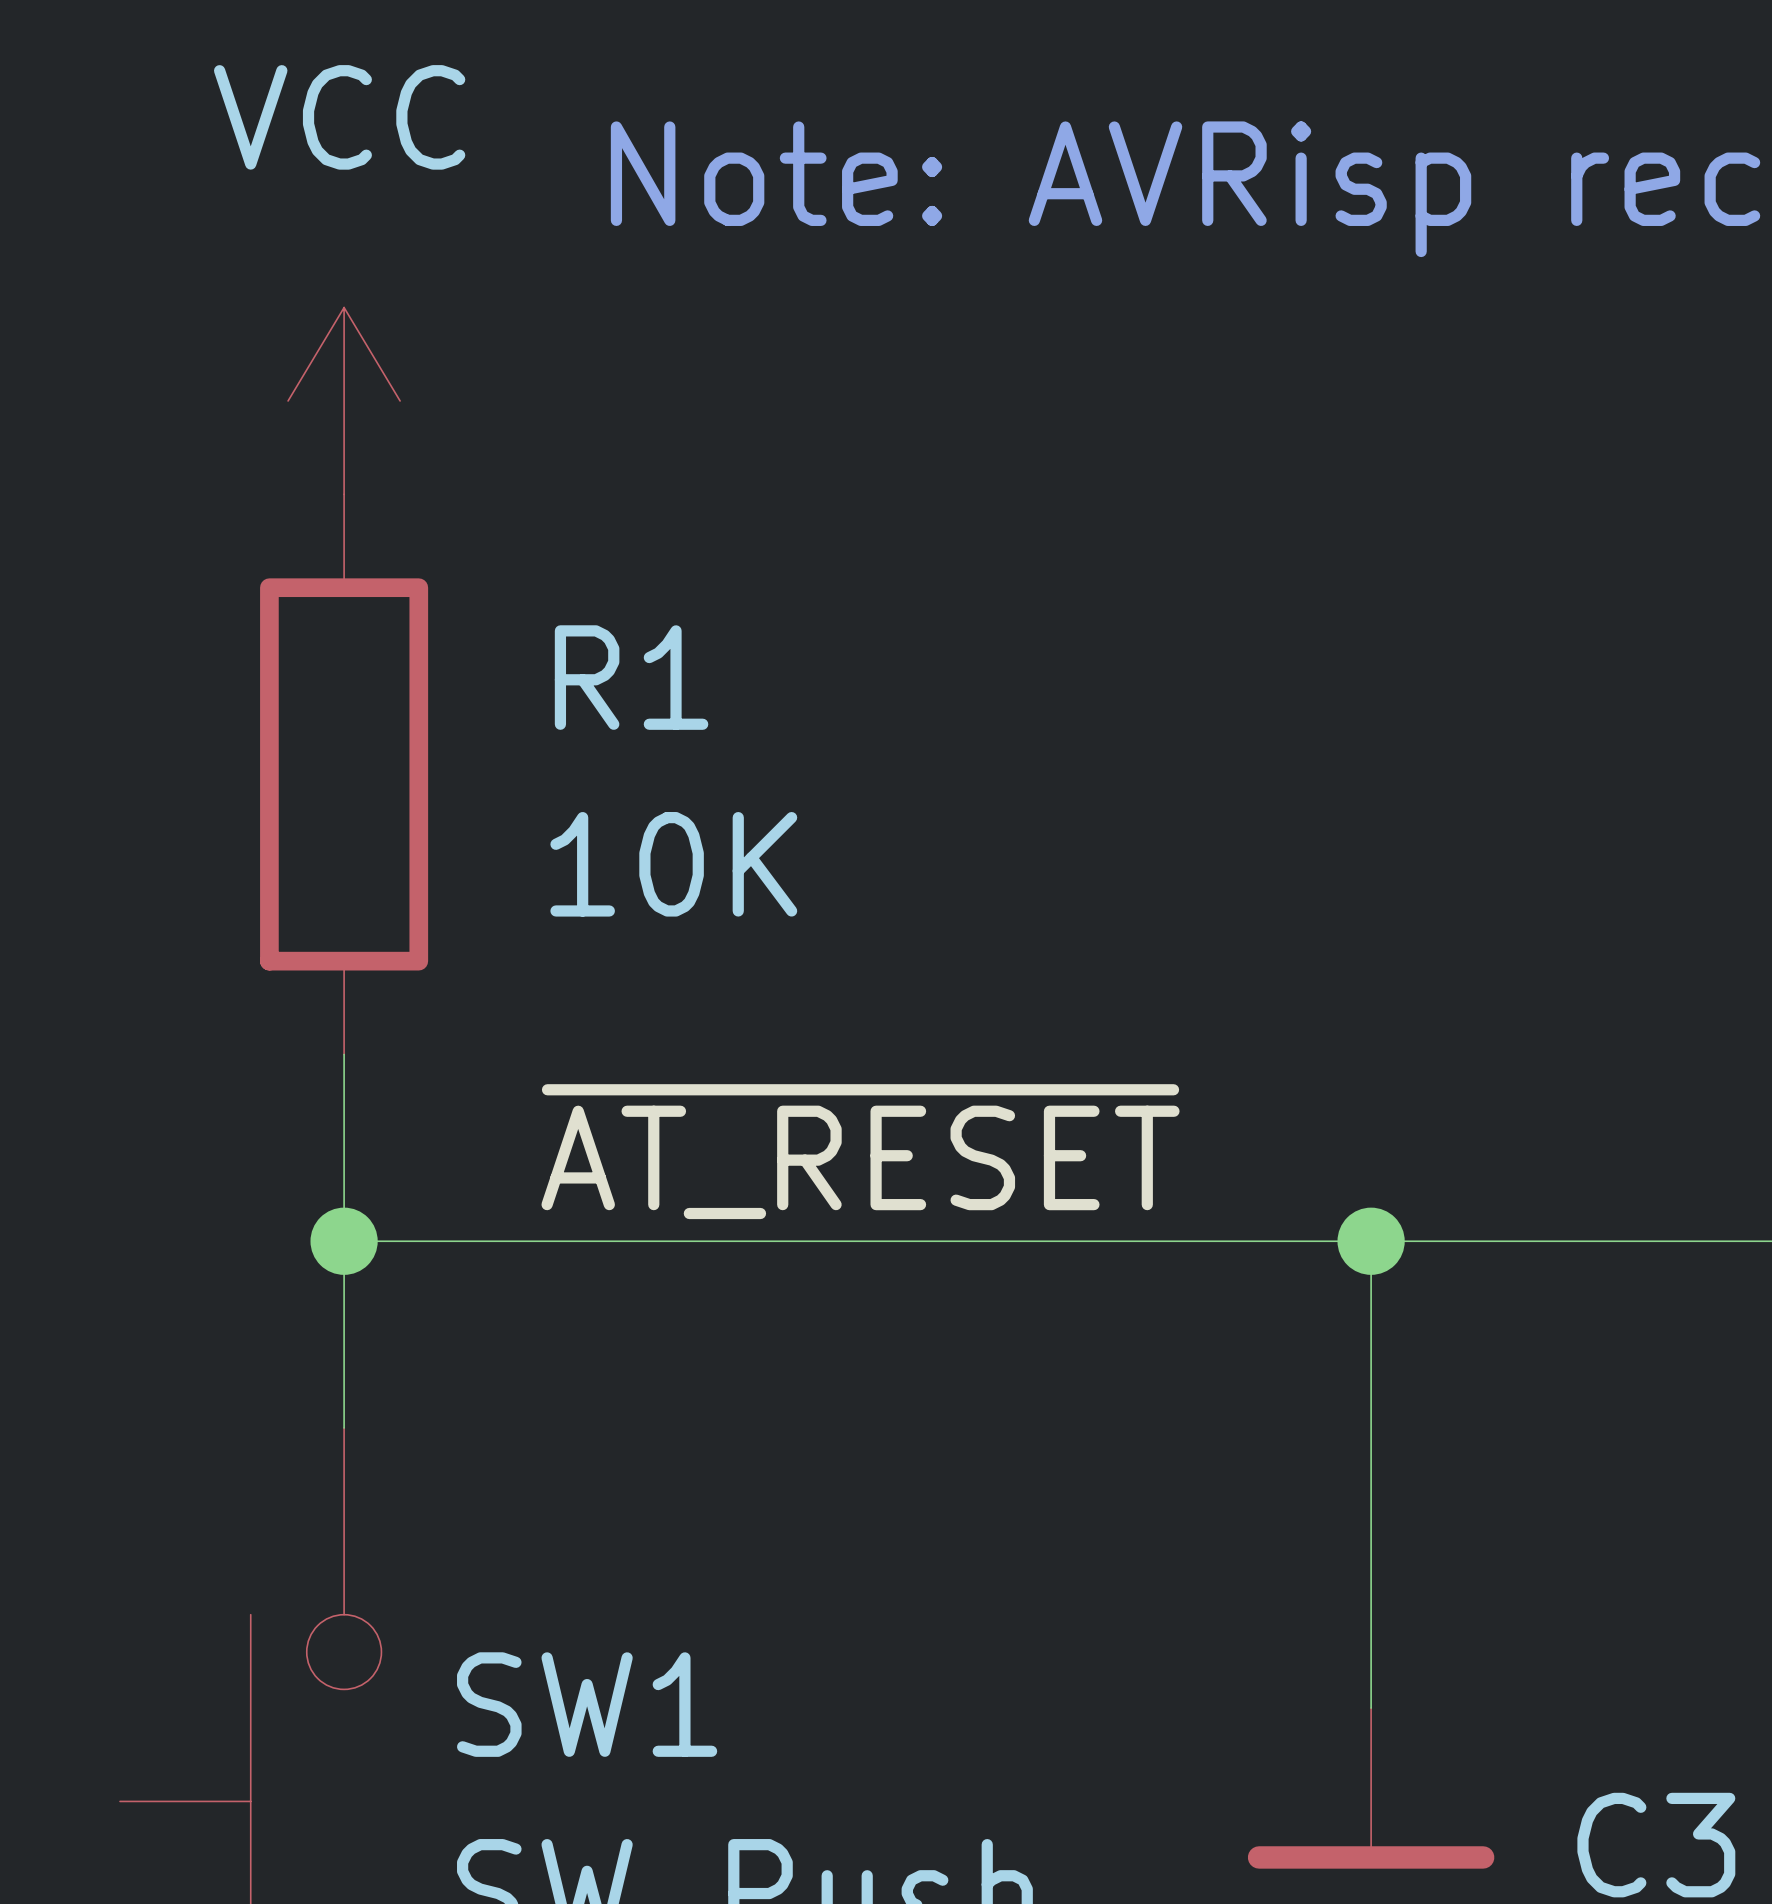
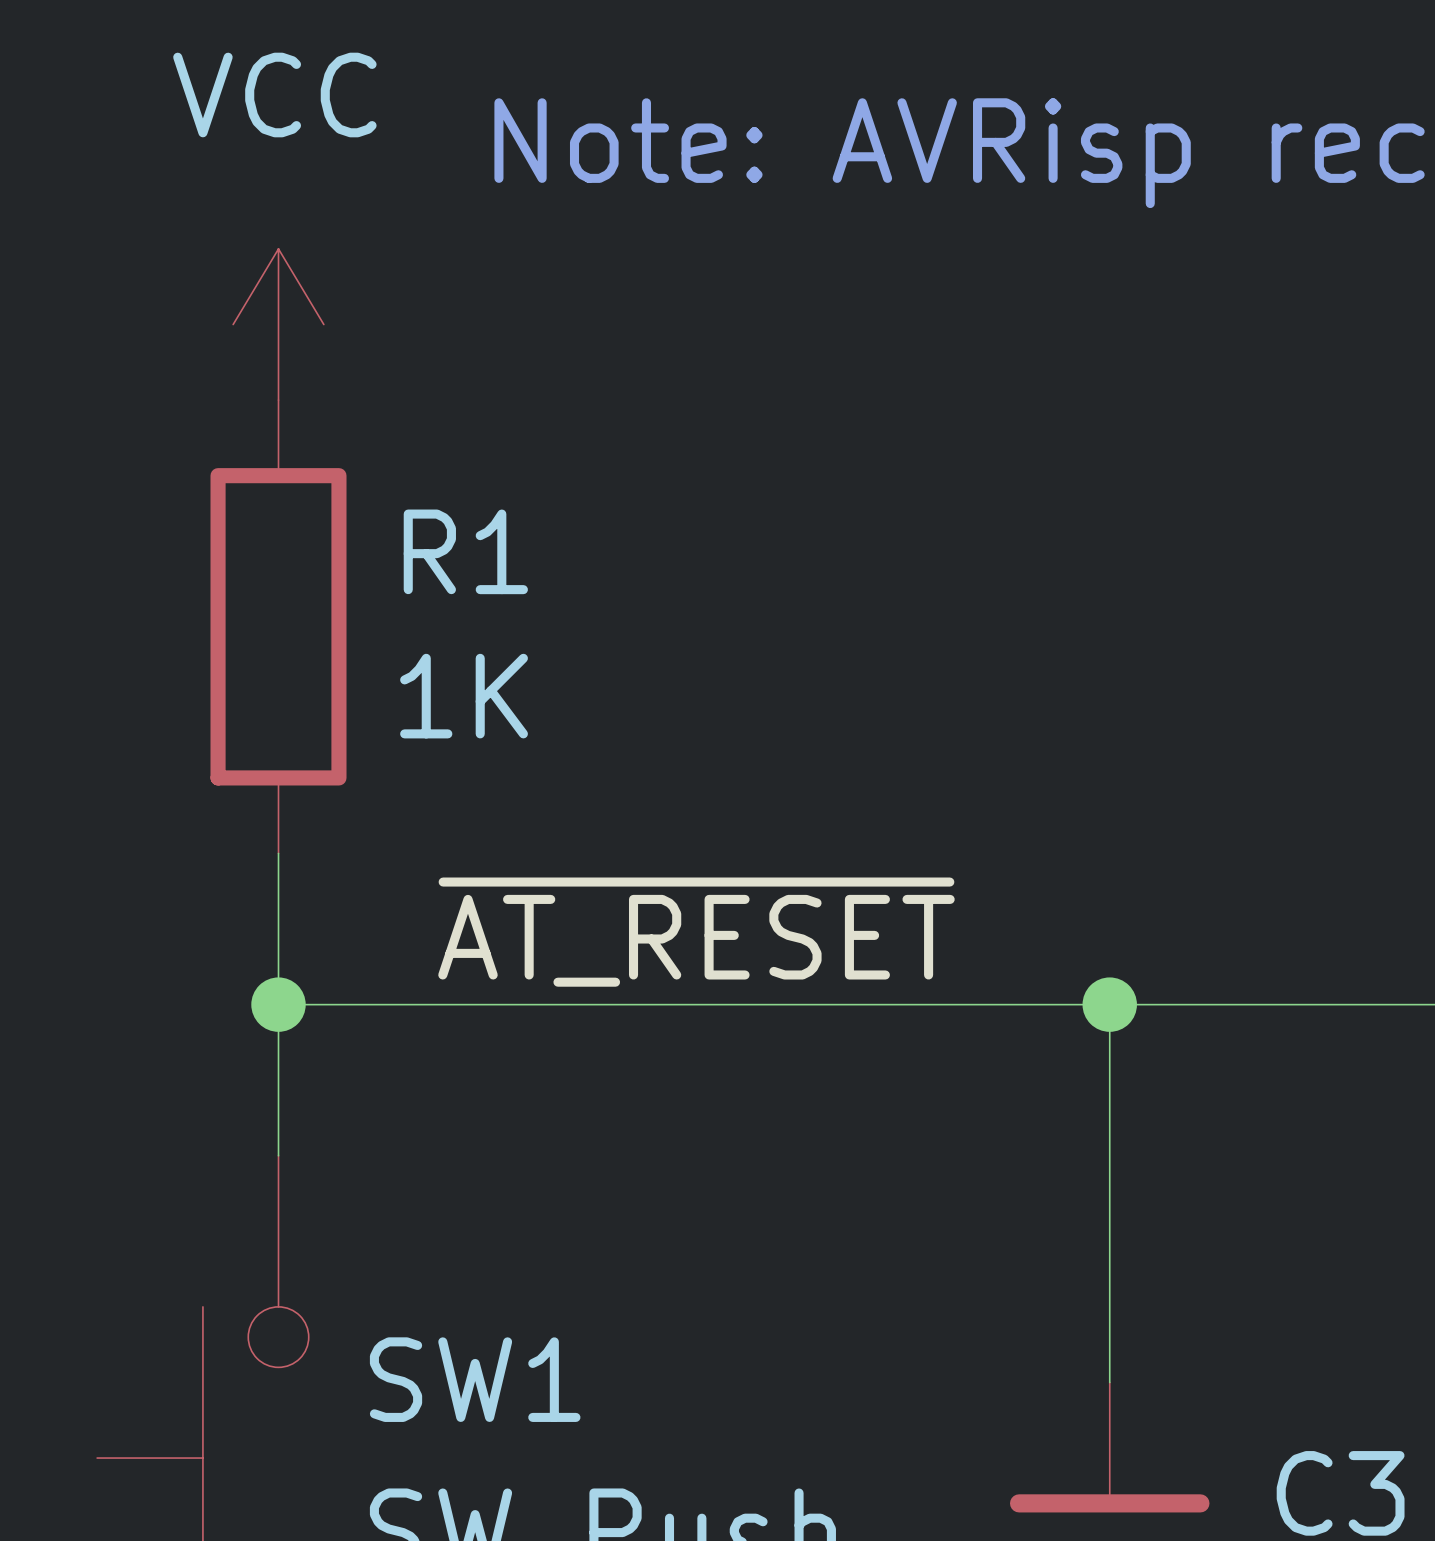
R1 name position: R1 (631, 677) -> R1 (465, 551)
R1 value: 10K (673, 864) -> 1K (464, 696)

